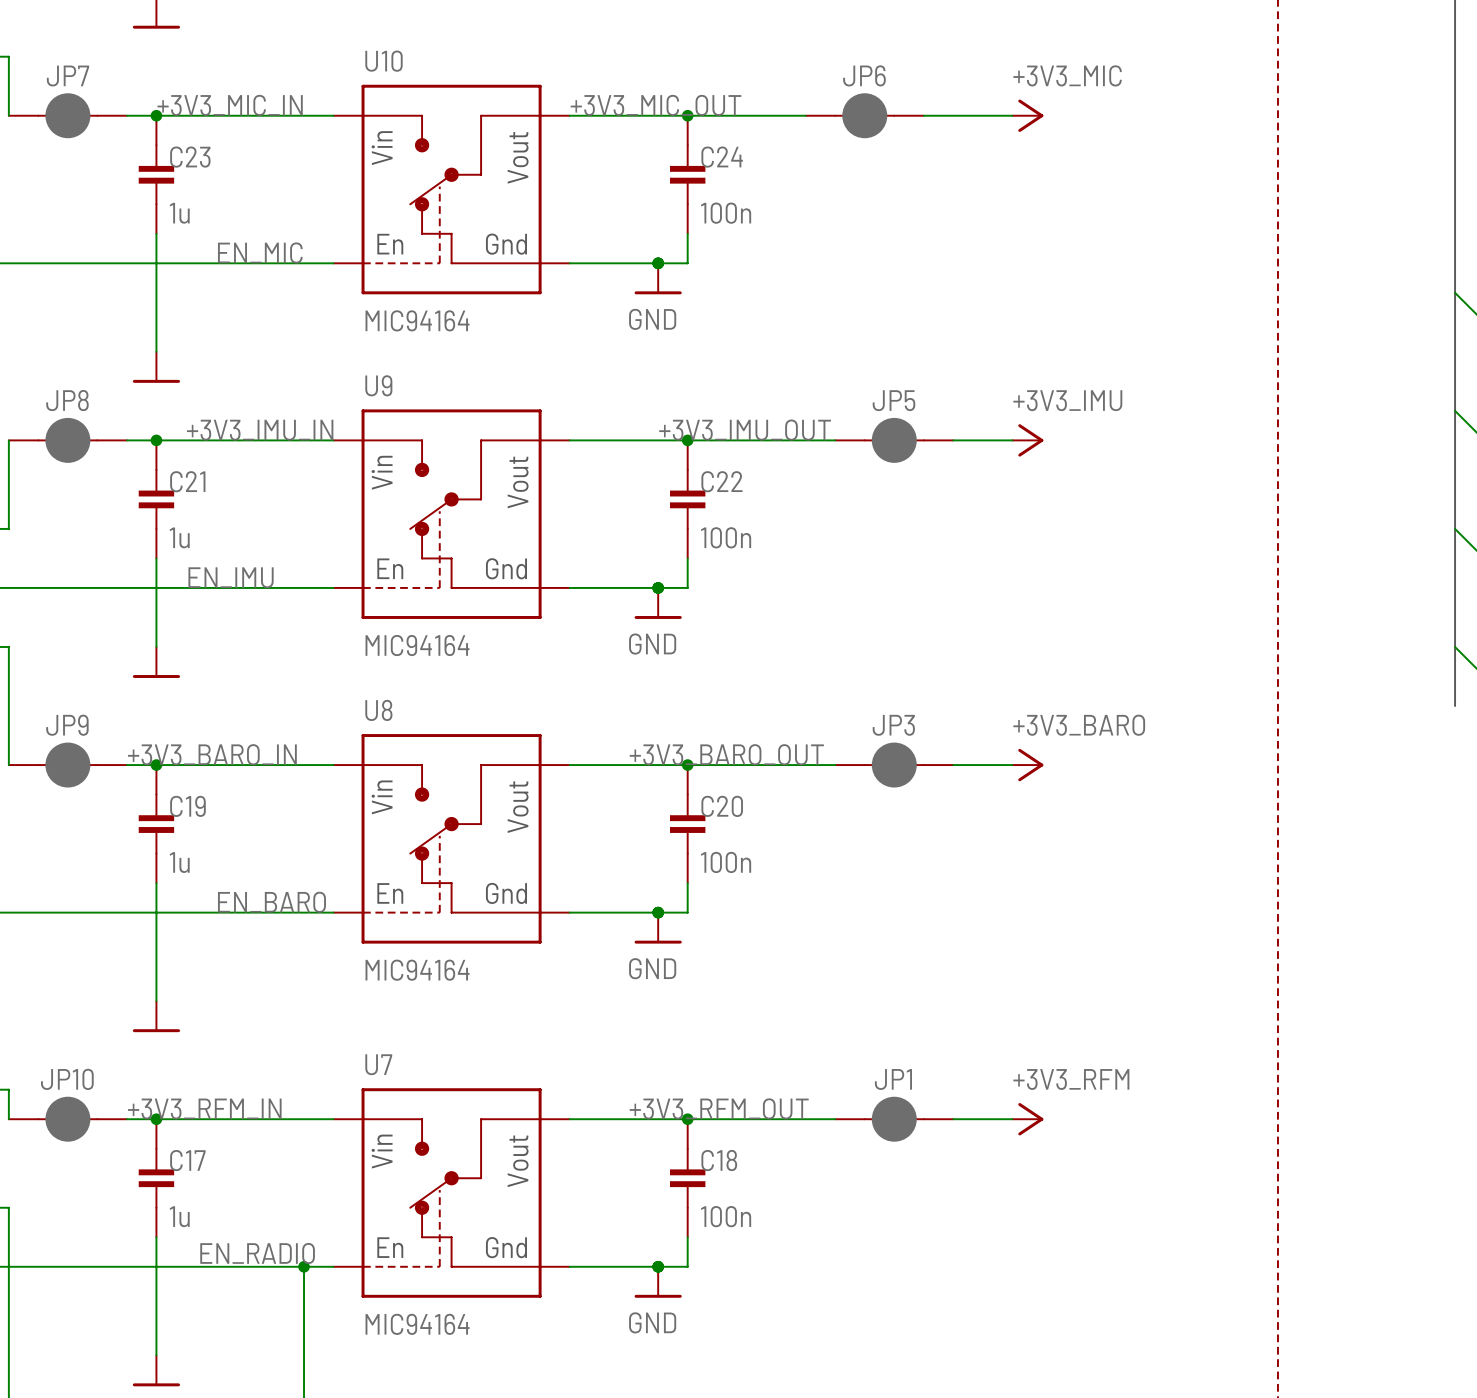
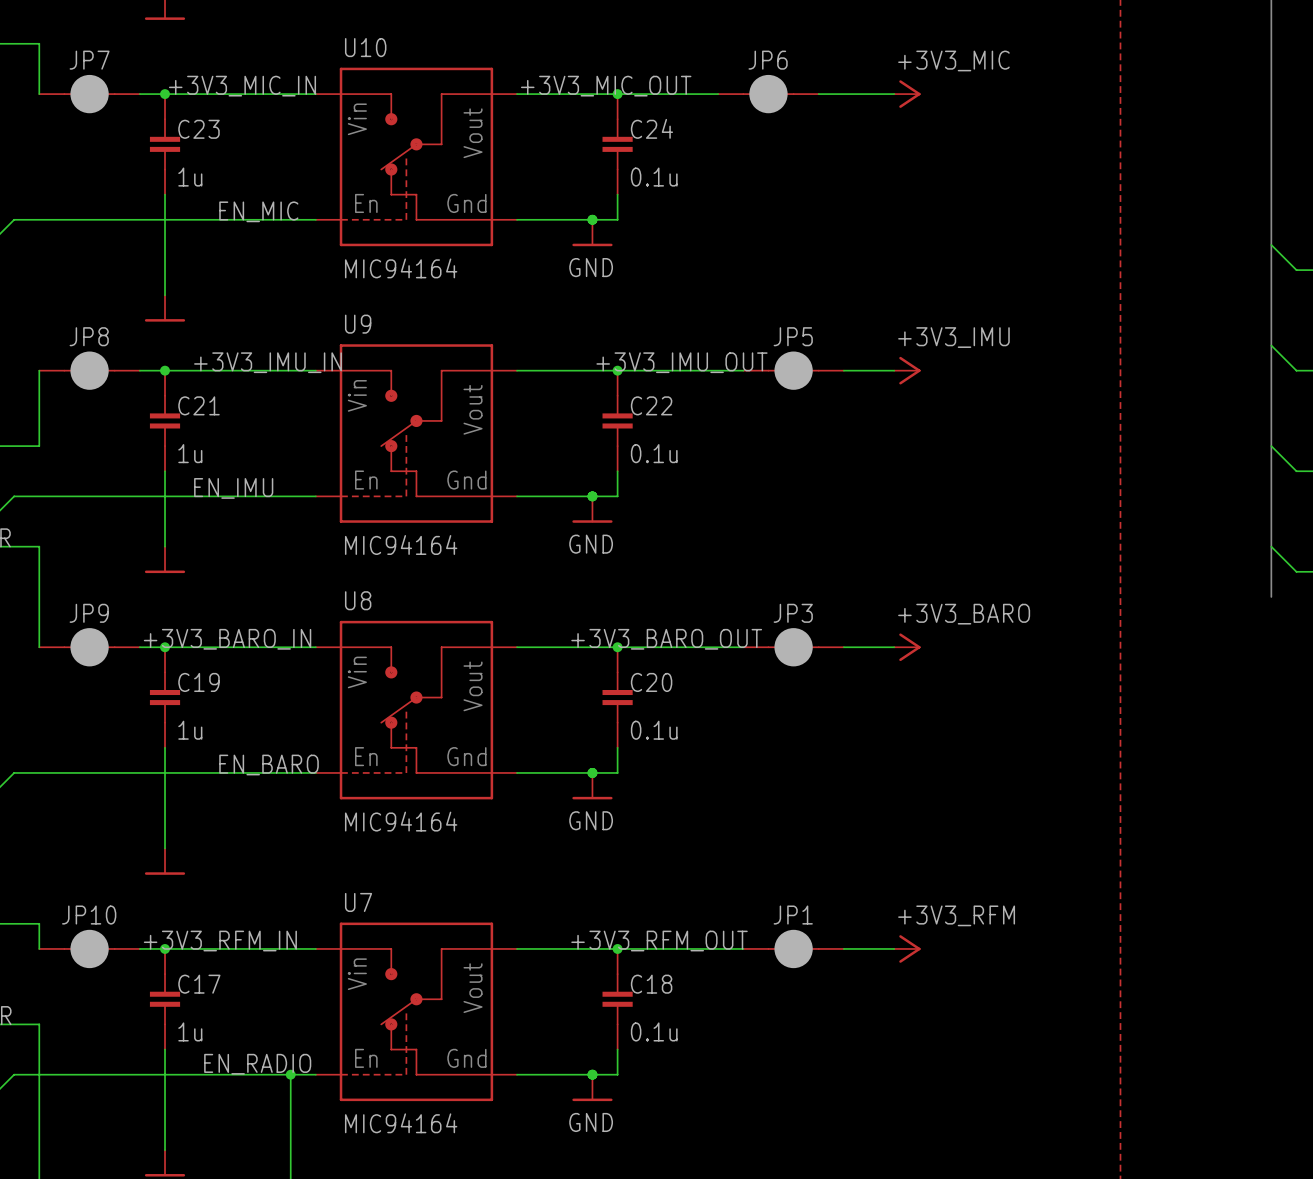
C24 value: 100n (726, 213) -> 0.1u (654, 177)
C22 value: 100n (726, 537) -> 0.1u (654, 453)
C20 value: 100n (726, 862) -> 0.1u (654, 730)
C18 value: 100n (726, 1216) -> 0.1u (654, 1031)

